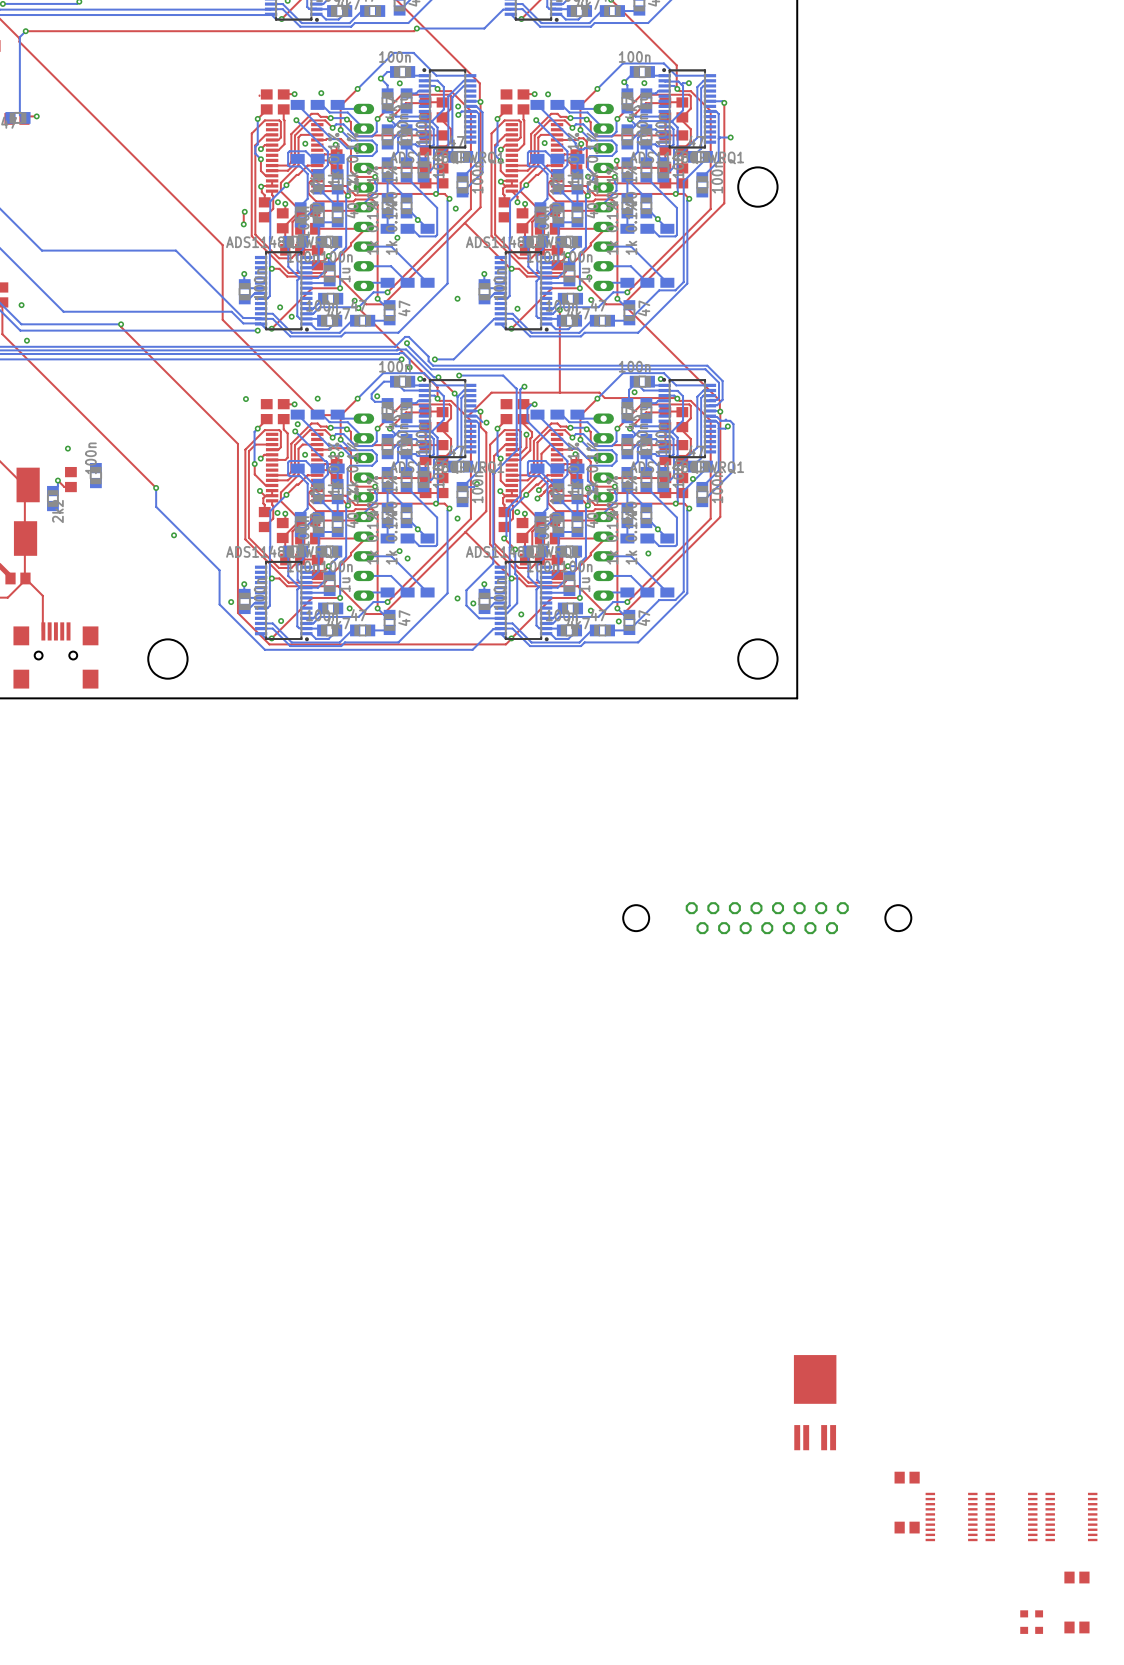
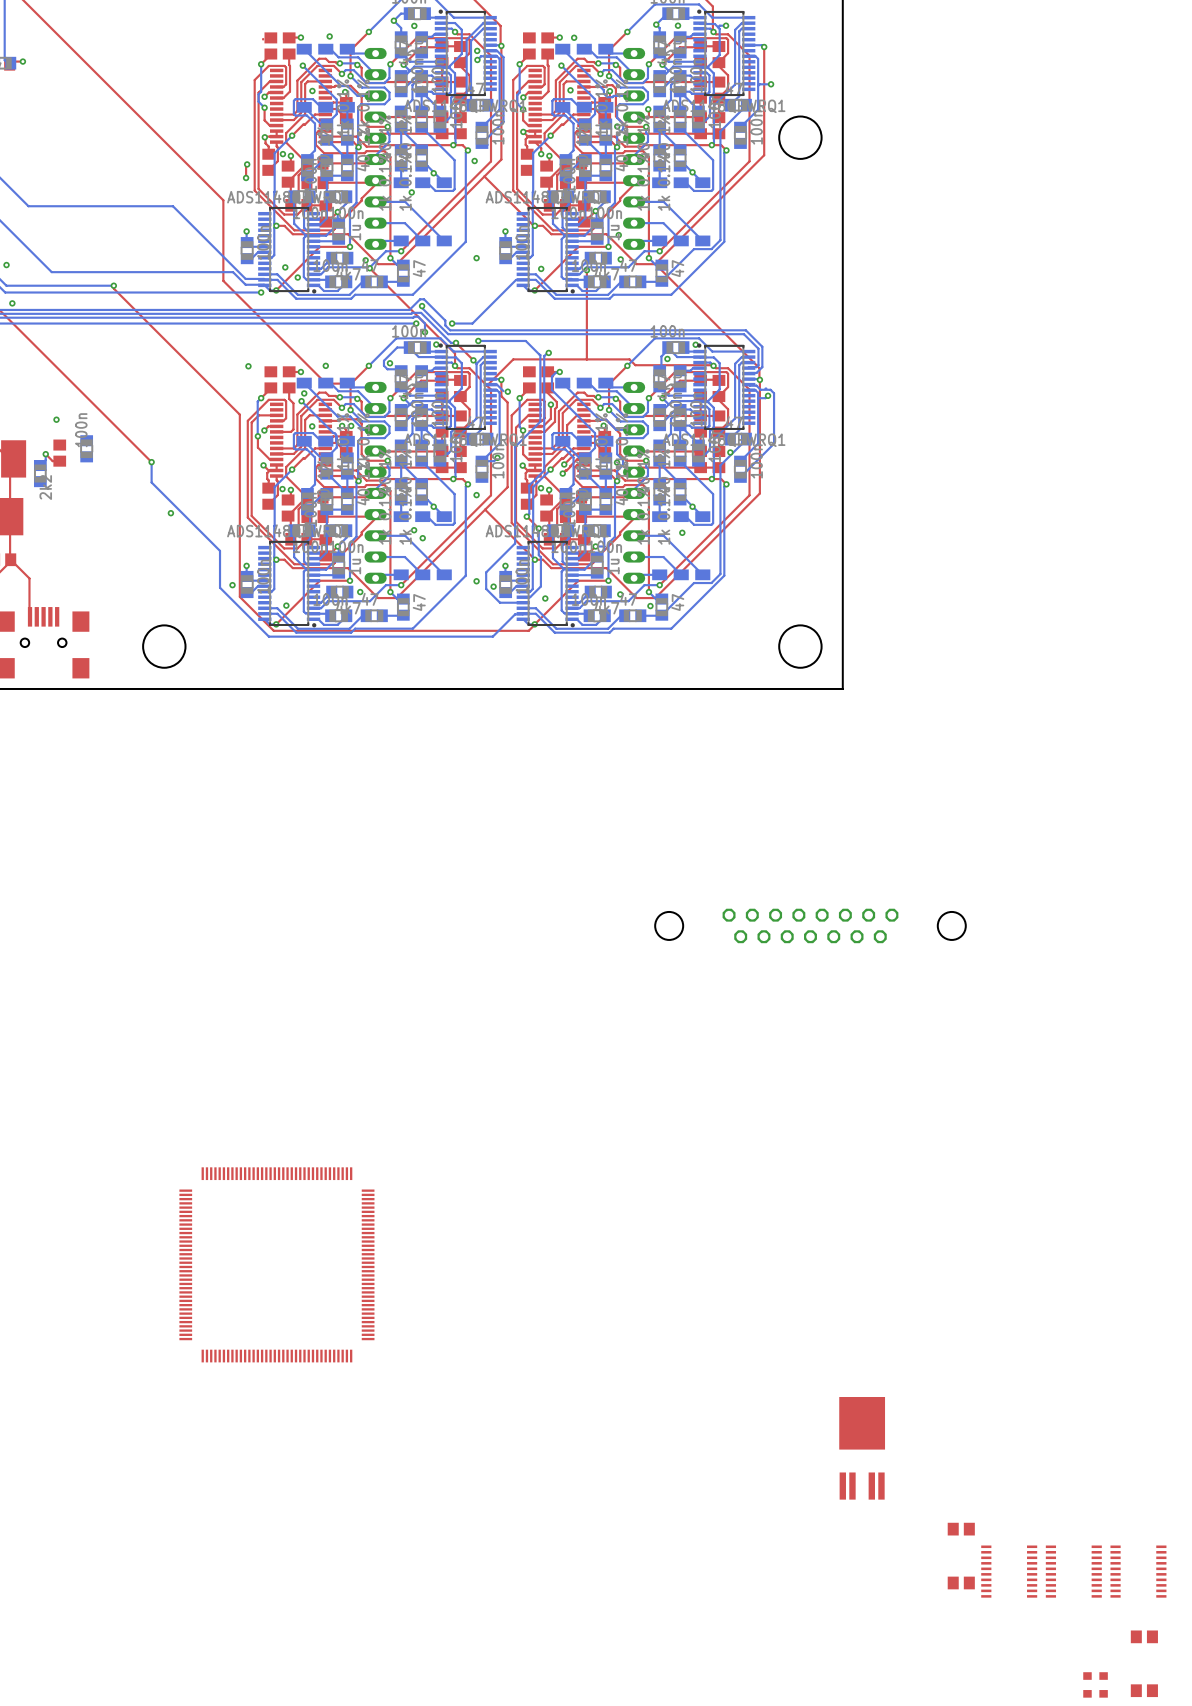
part: none -> (276, 1264)

